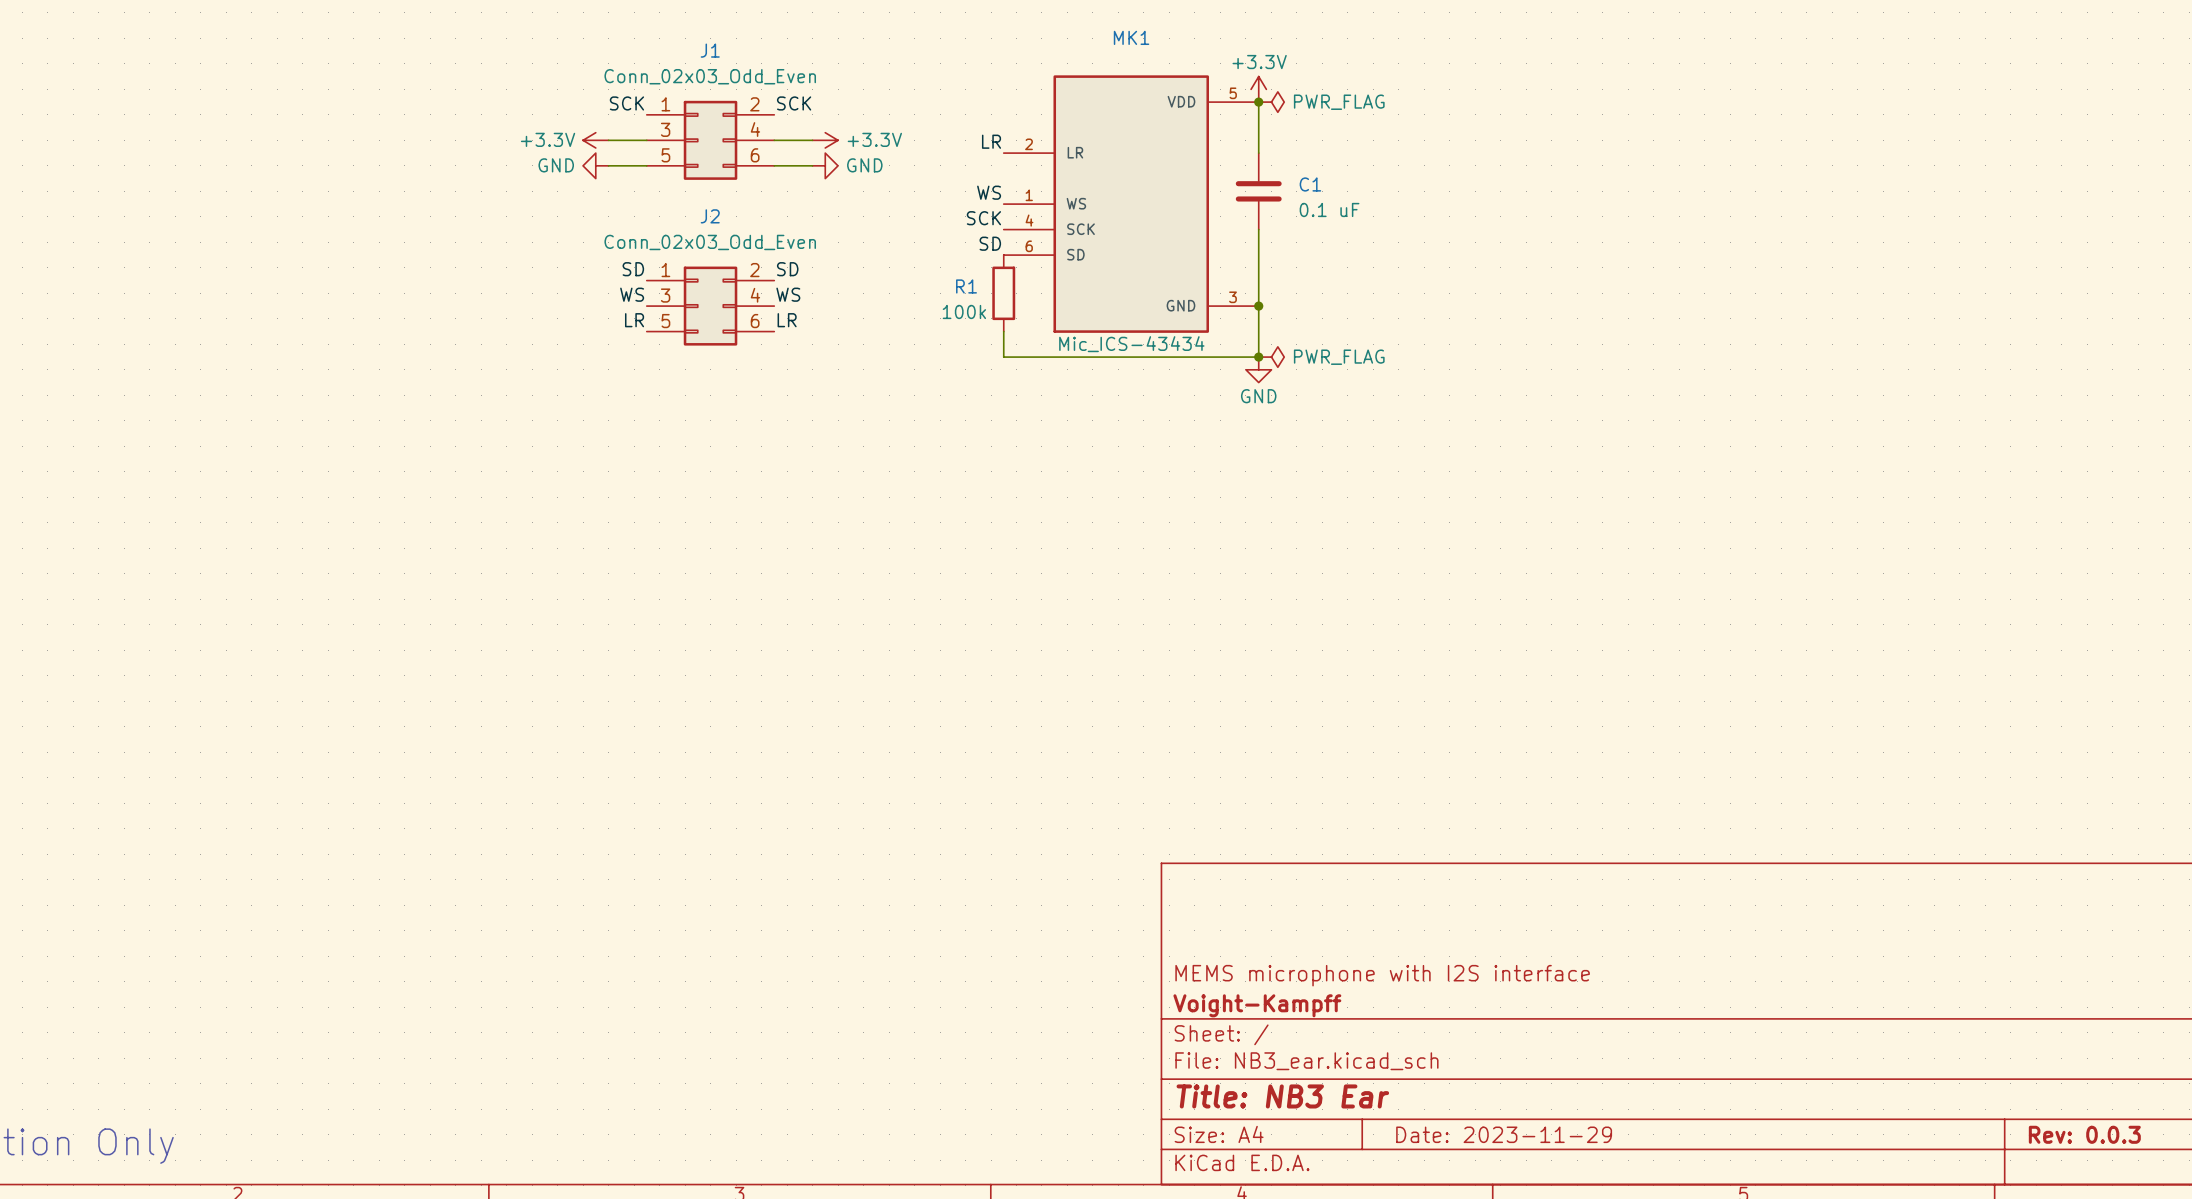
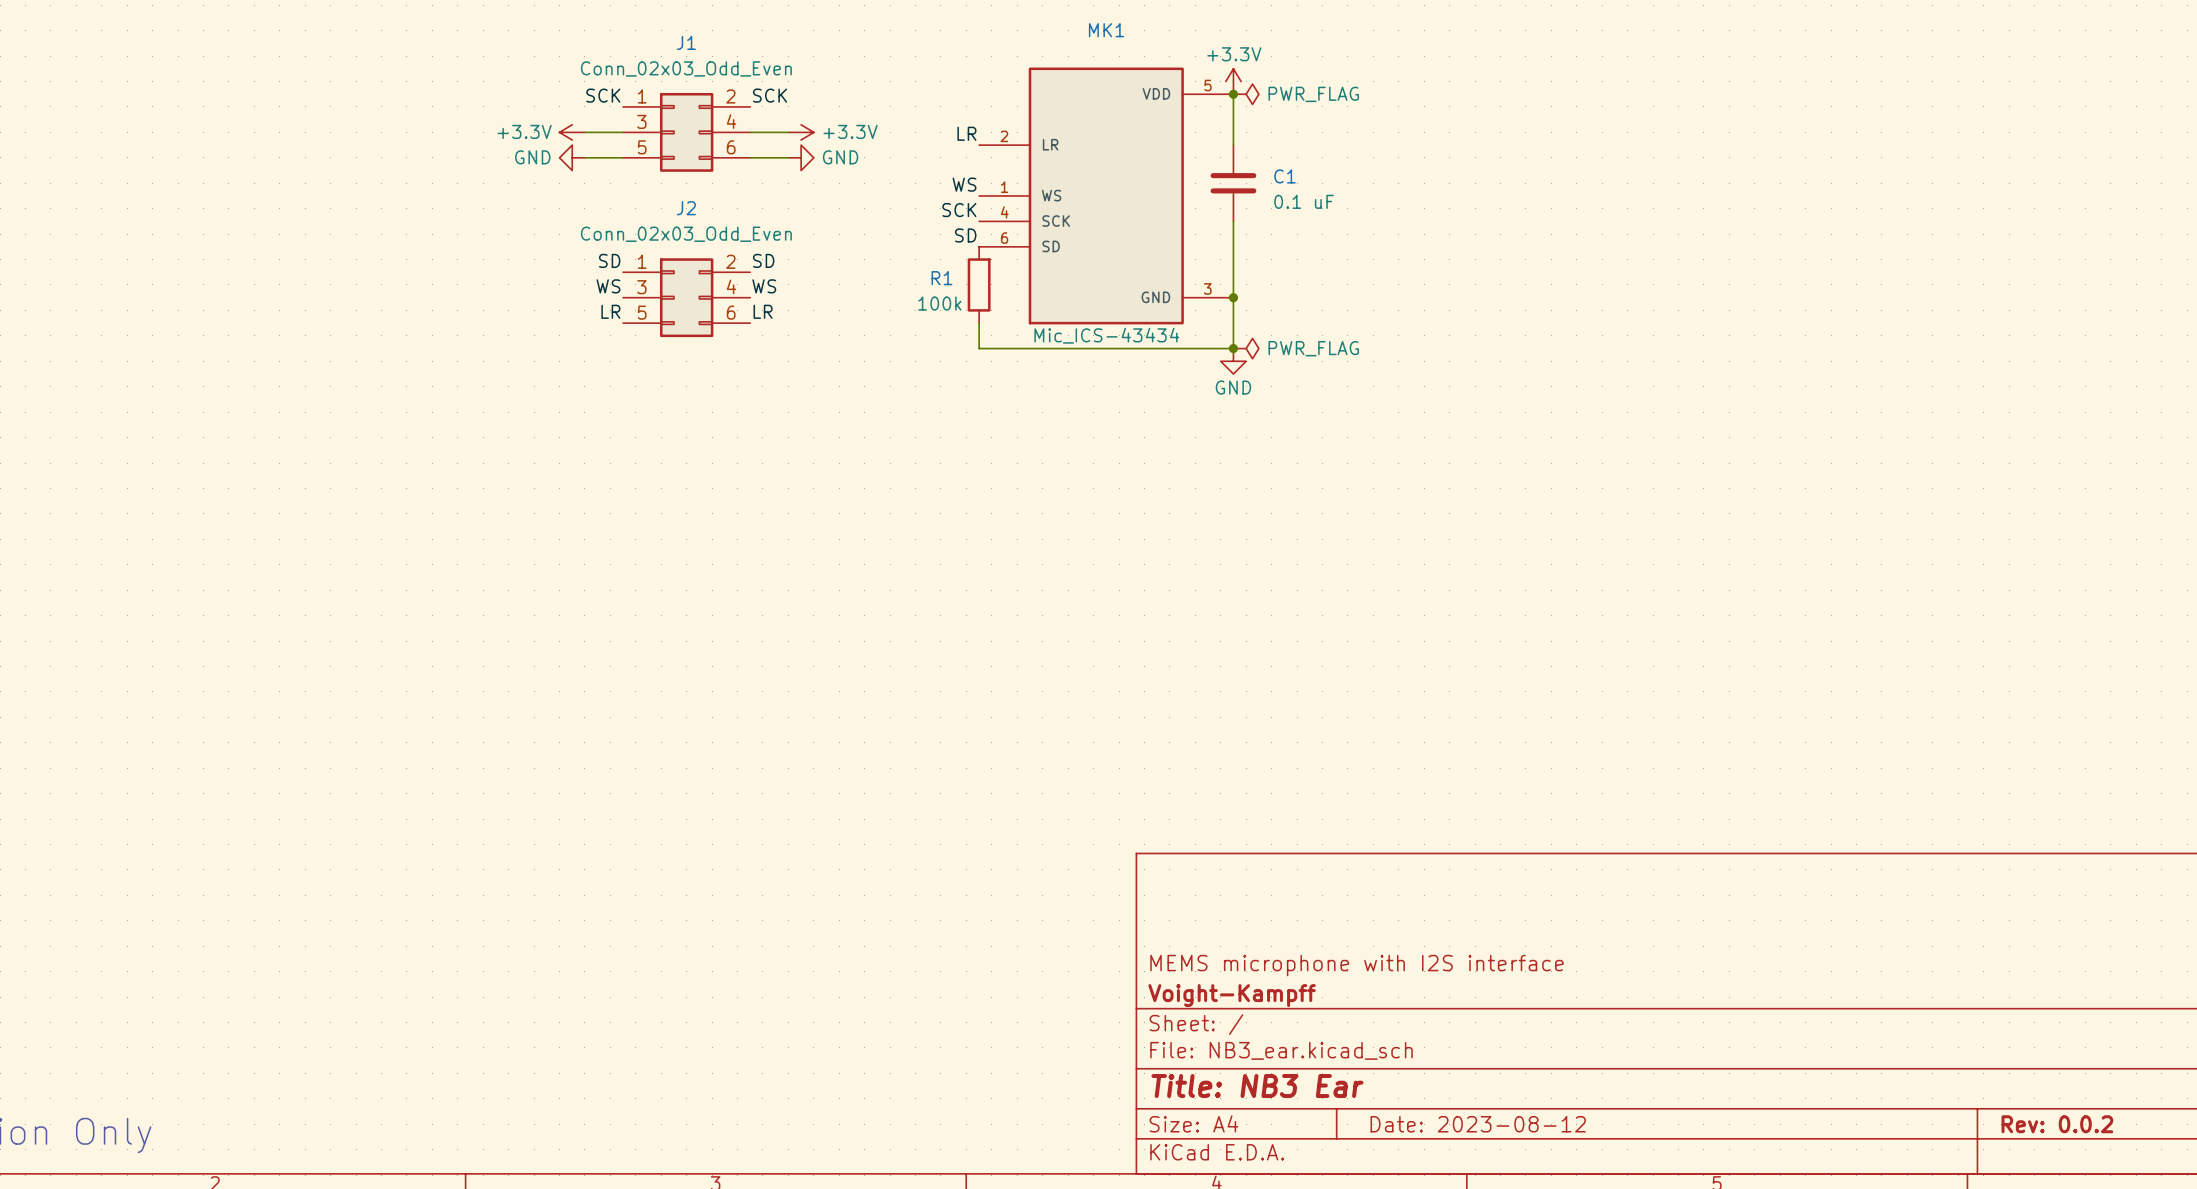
title block: Date: 2023-11-29 (1504, 1134) -> Date: 2023-08-12 (1478, 1124)
title block: Rev: 0.0.3 (2084, 1134) -> Rev: 0.0.2 (2057, 1124)

